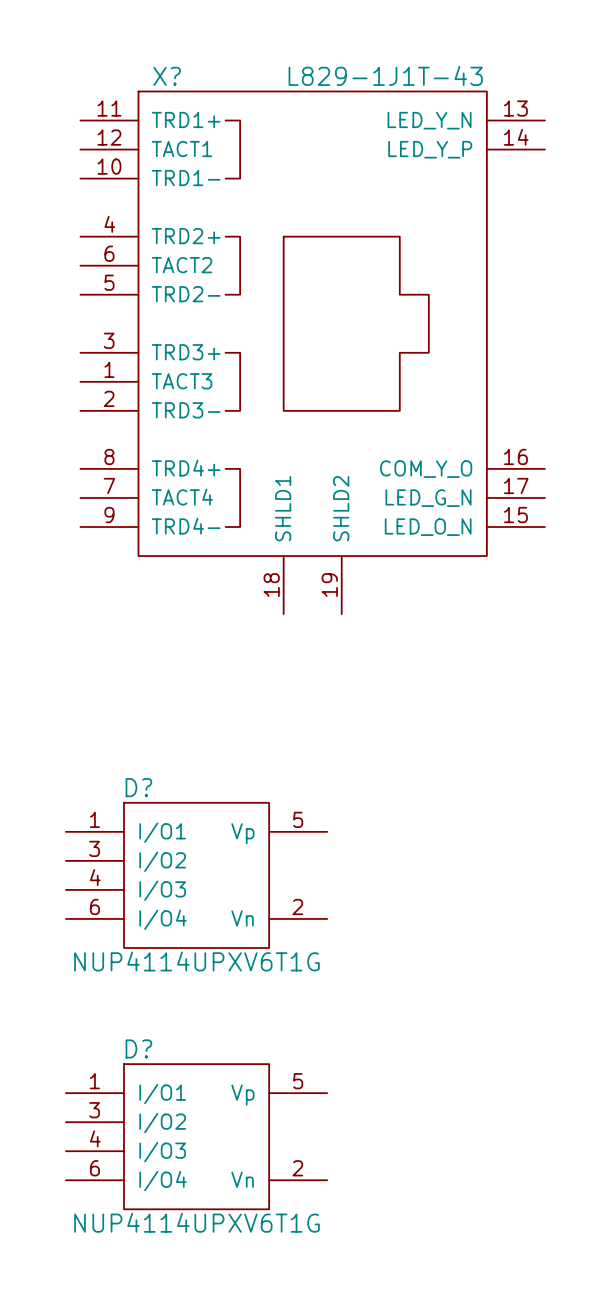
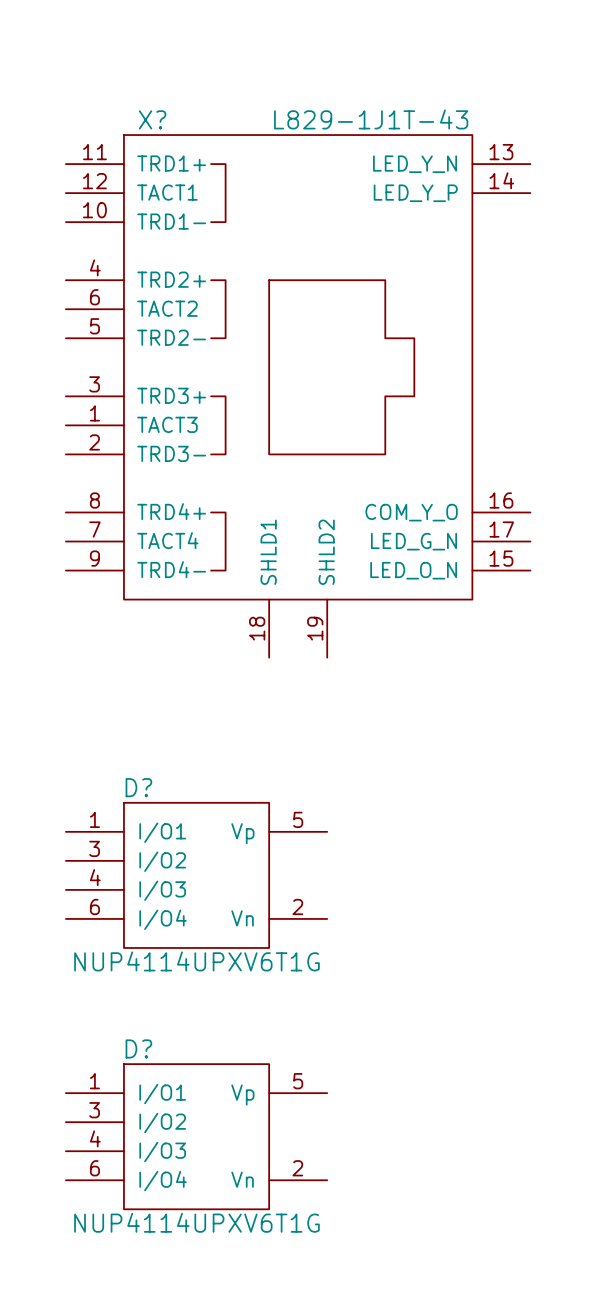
X? position: (312, 352) -> (298, 396)

